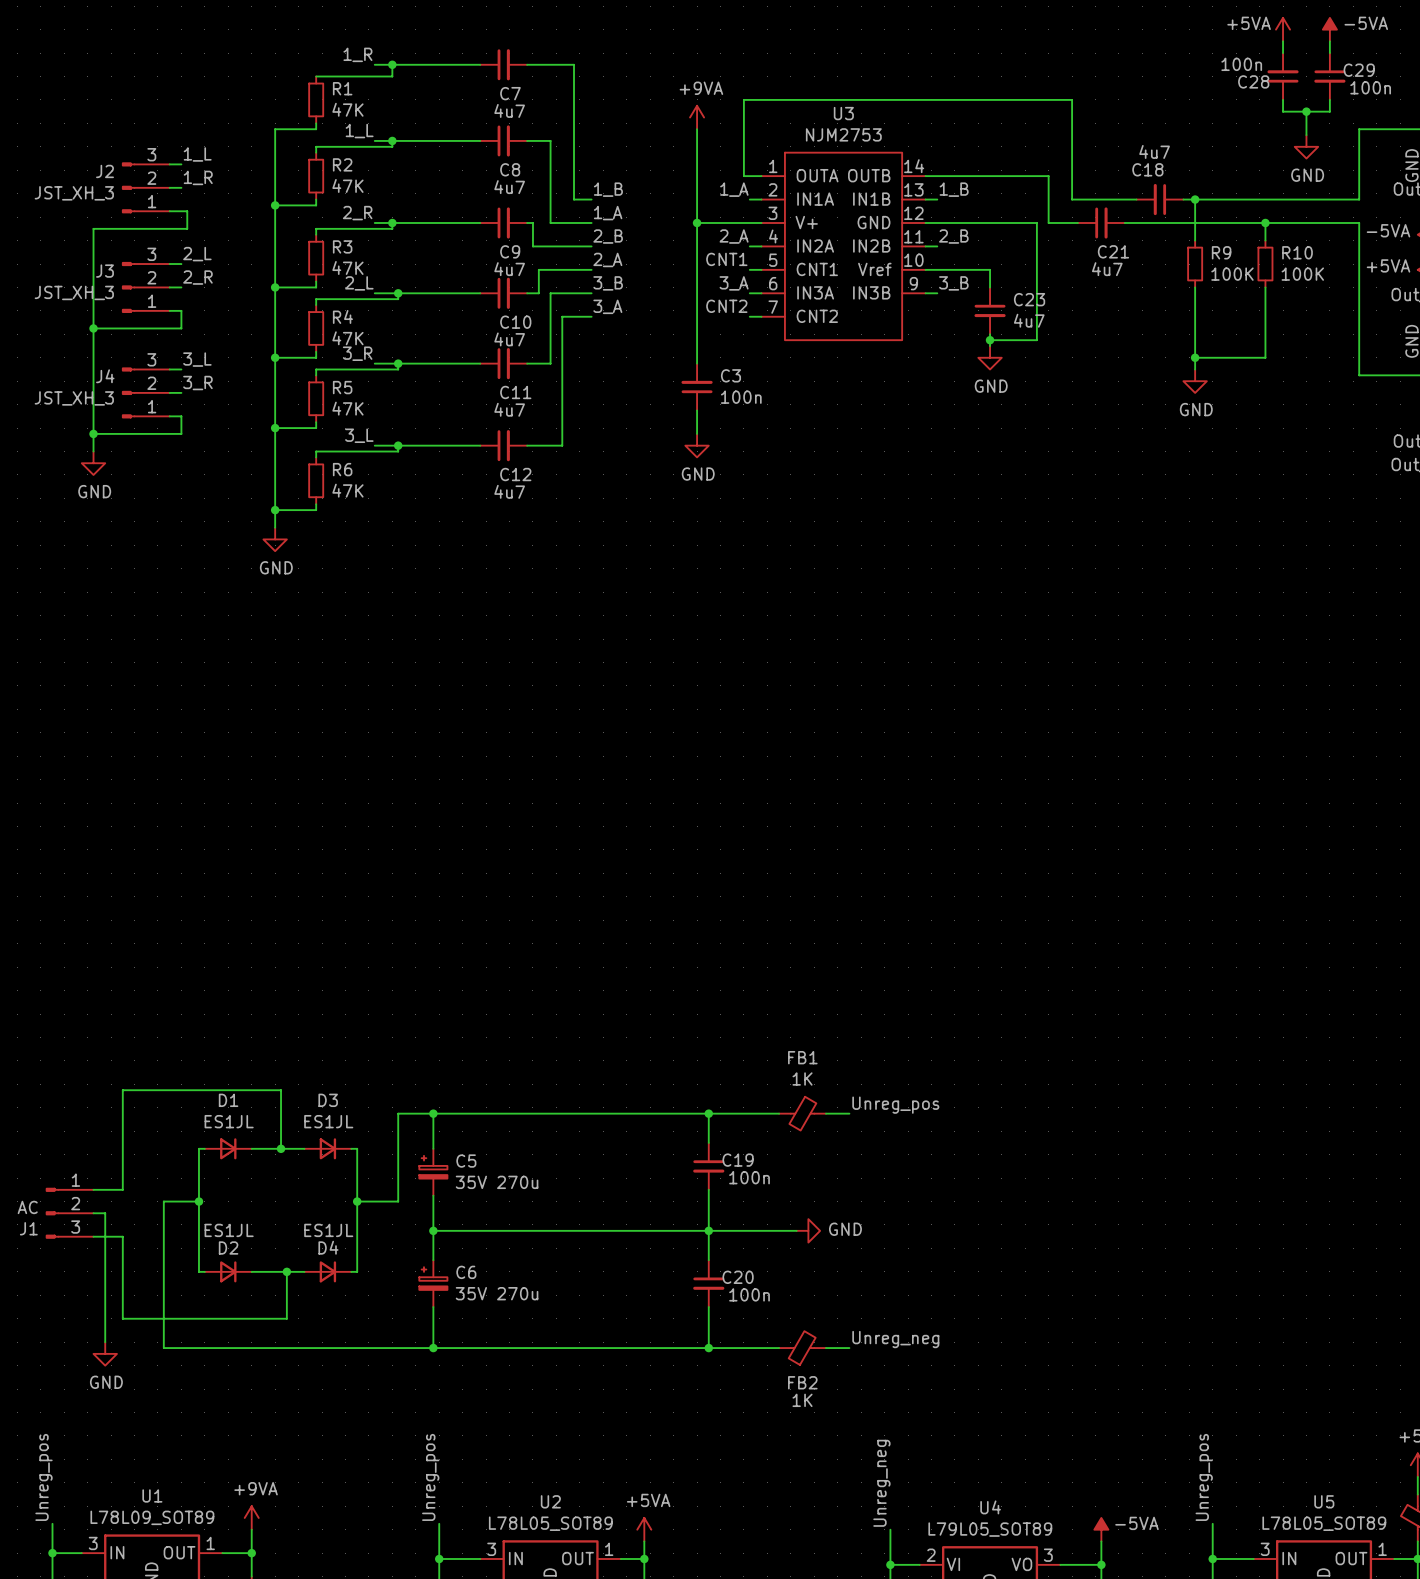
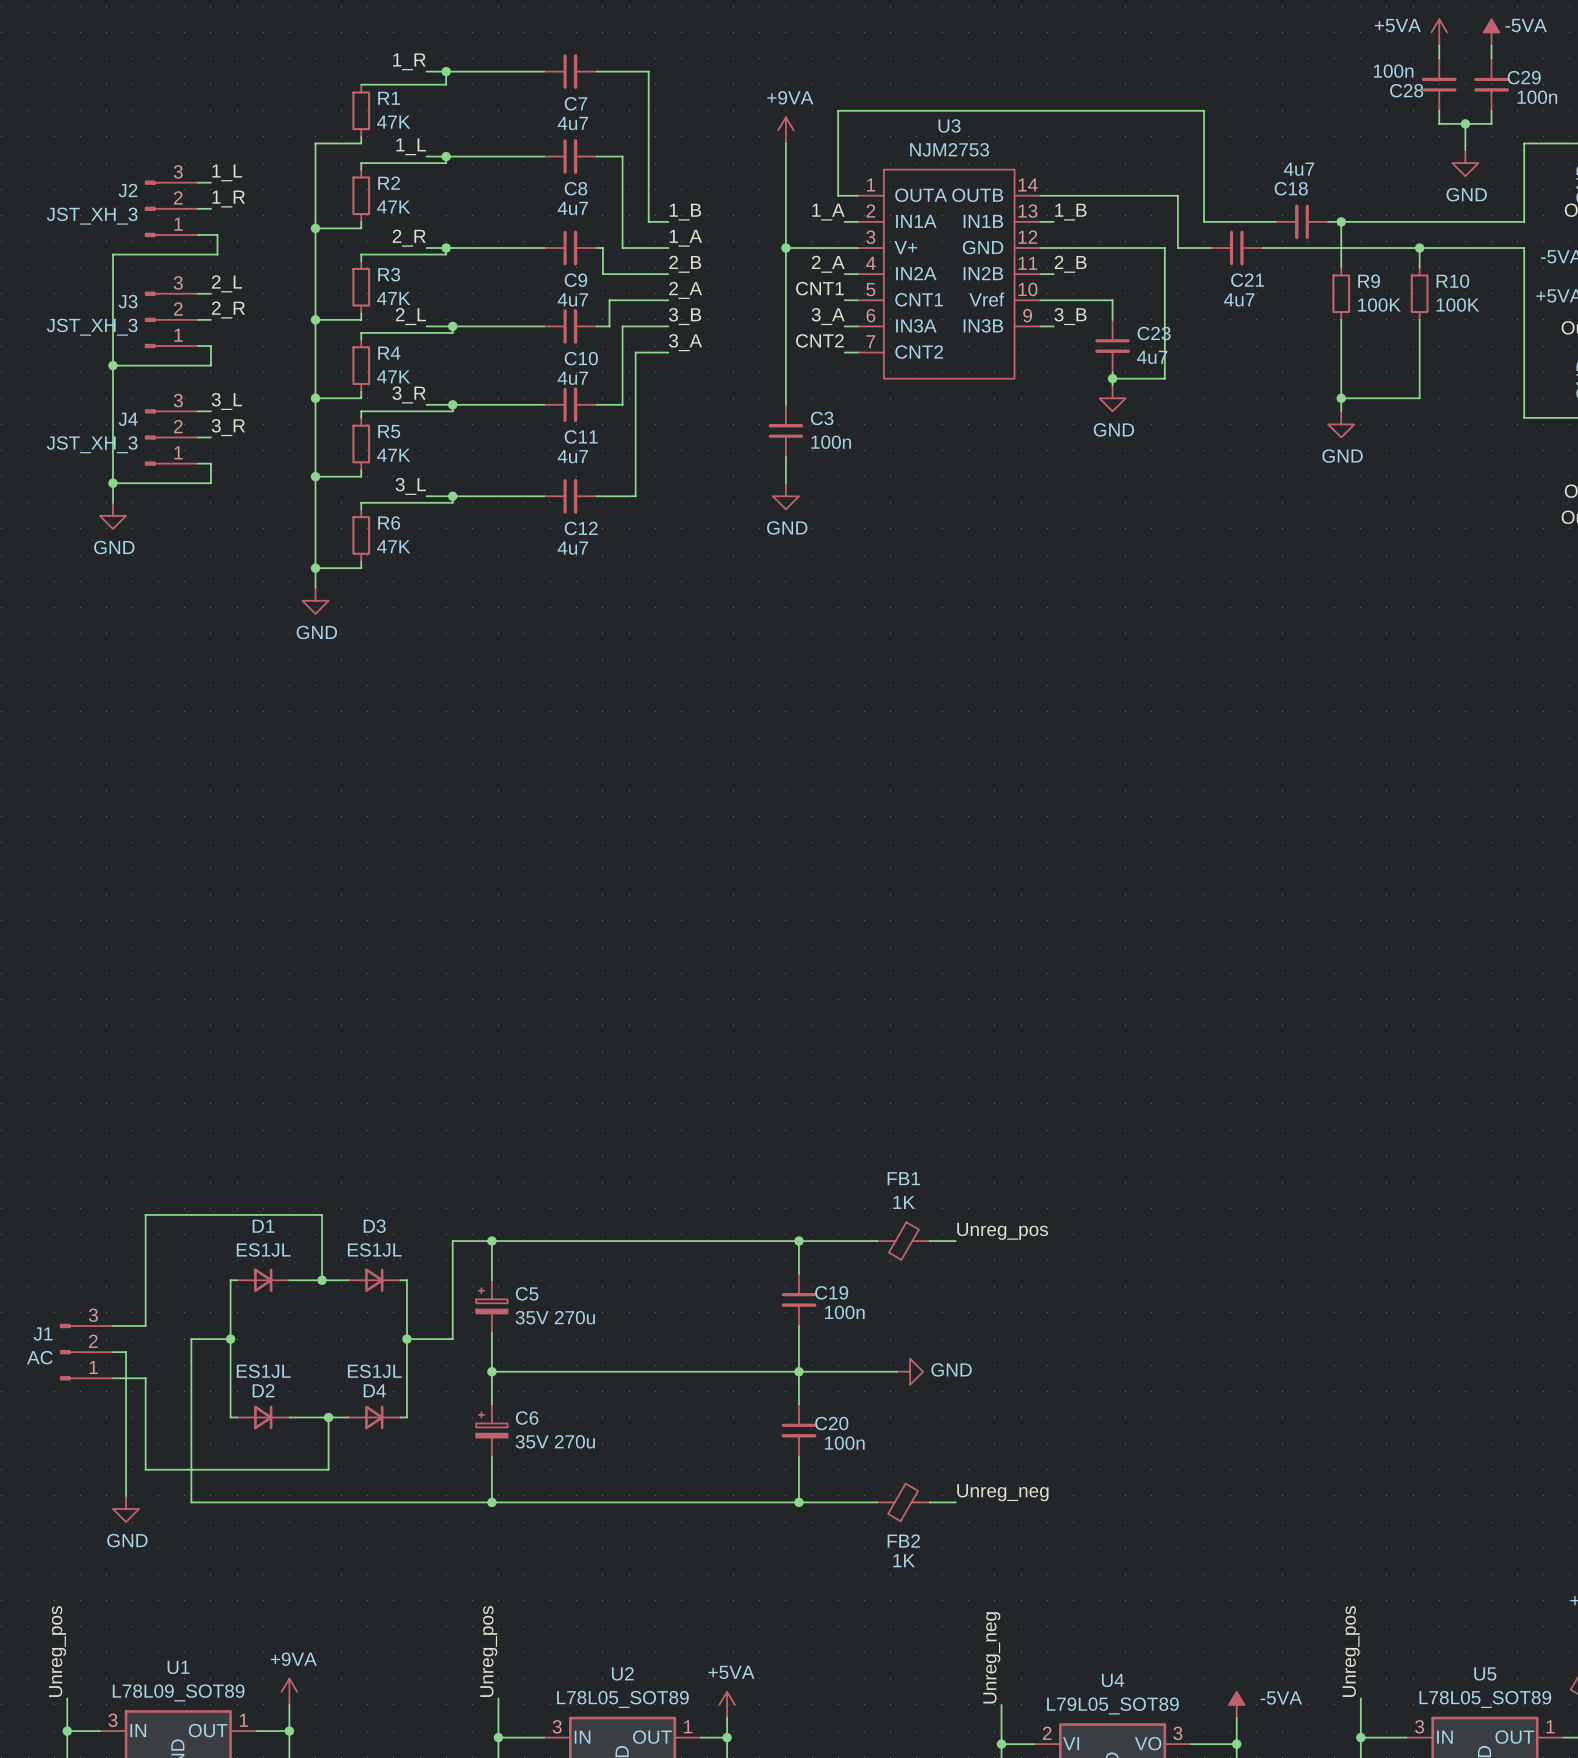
J1 flip: as is (52, 1213) -> up-down (67, 1352)

